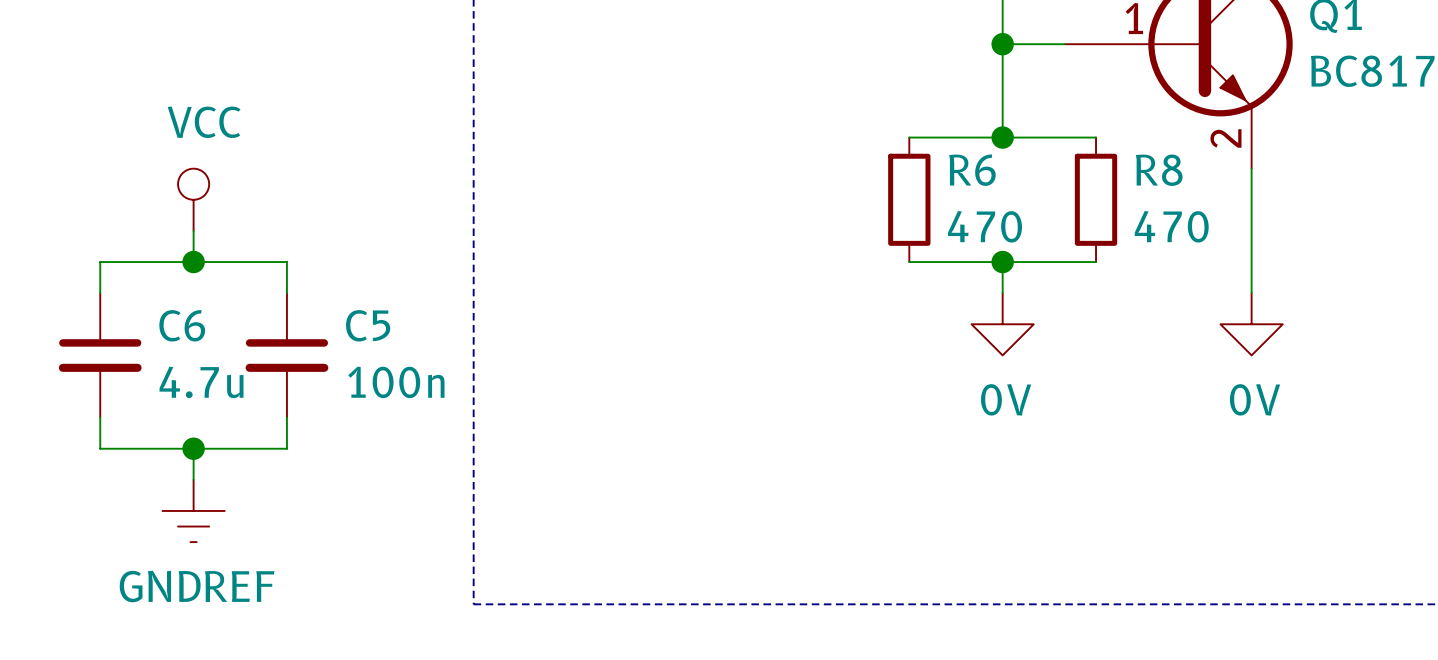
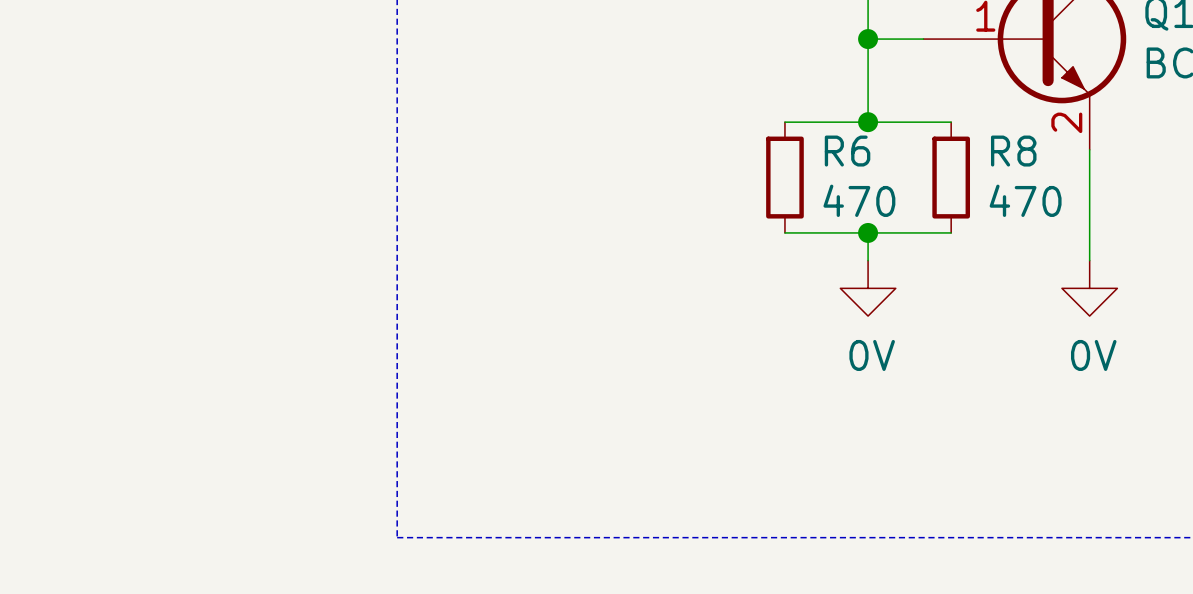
power symbol: VCC (193, 199) -> none
wire: (193, 230) (193, 262) -> none
junction: (193, 262) -> none
wire: (100, 293) (100, 262) (286, 262) (286, 293) -> none
C6: 4.7u (100, 355) -> none
C5: 100n (286, 355) -> none
wire: (100, 417) (100, 448) (286, 448) (286, 417) -> none
wire: (193, 448) (193, 479) -> none
junction: (193, 448) -> none
power symbol: GNDREF (193, 510) -> none

